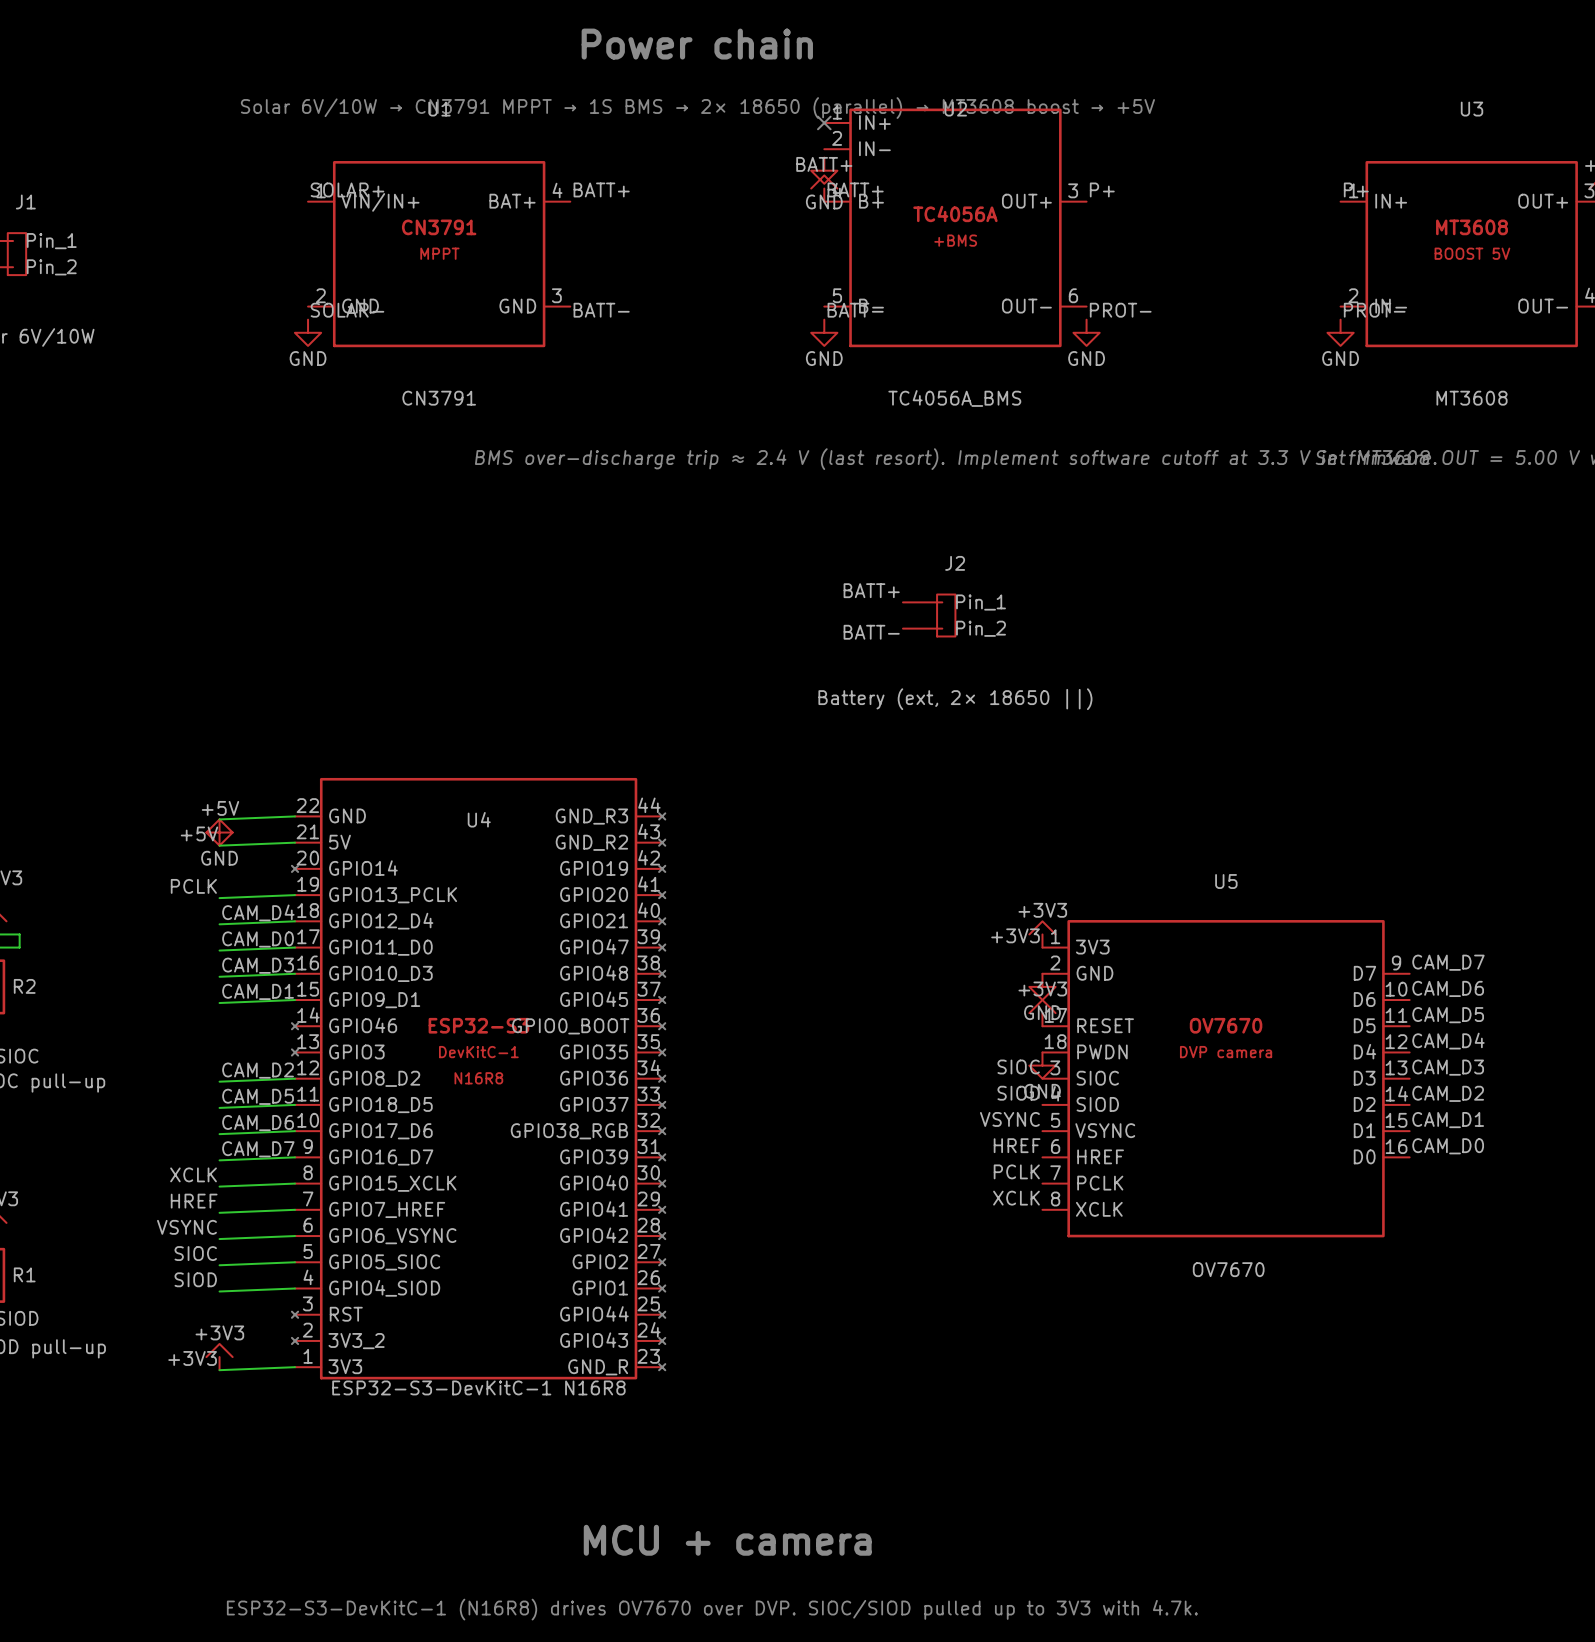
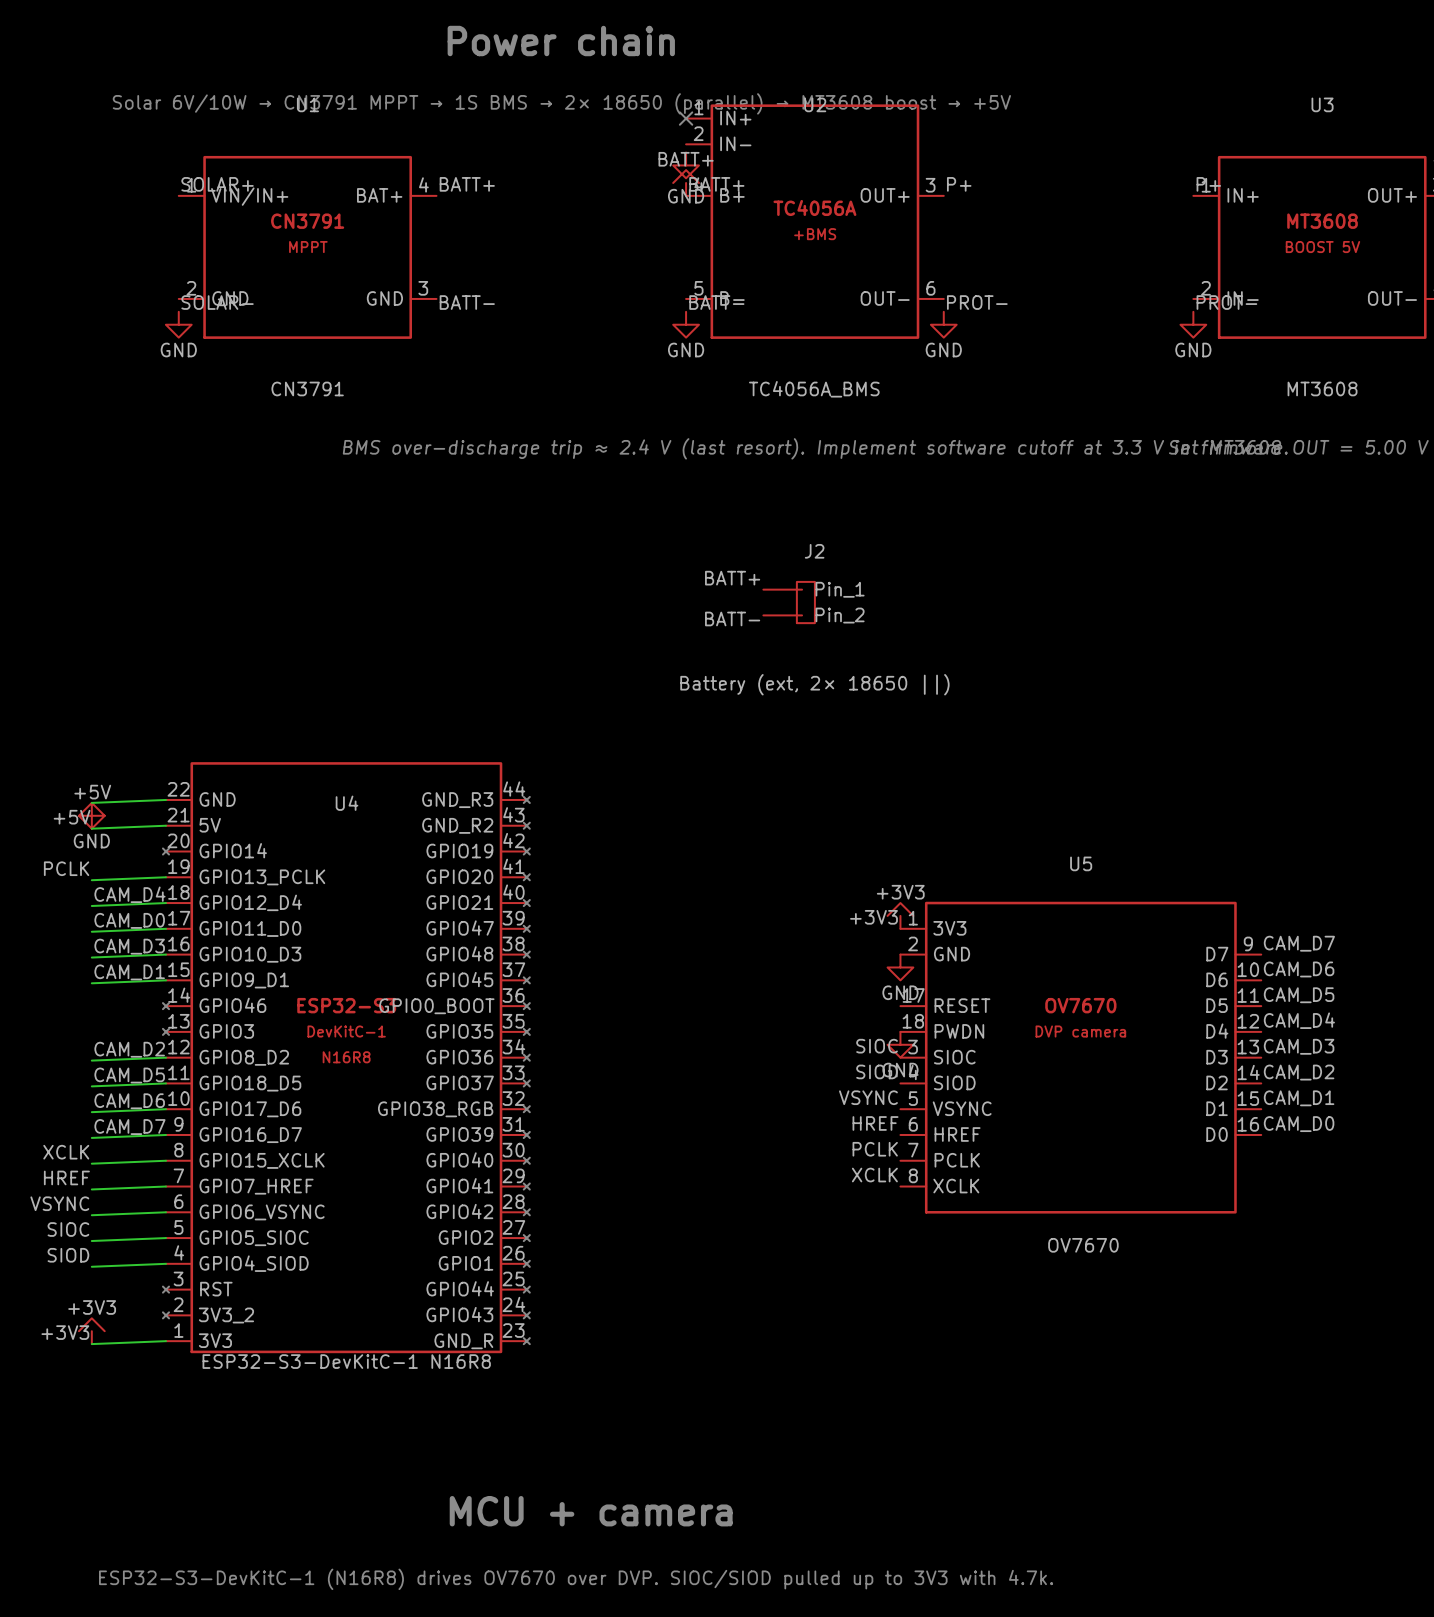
power symbol: +3V3 (1042, 1013) -> none

